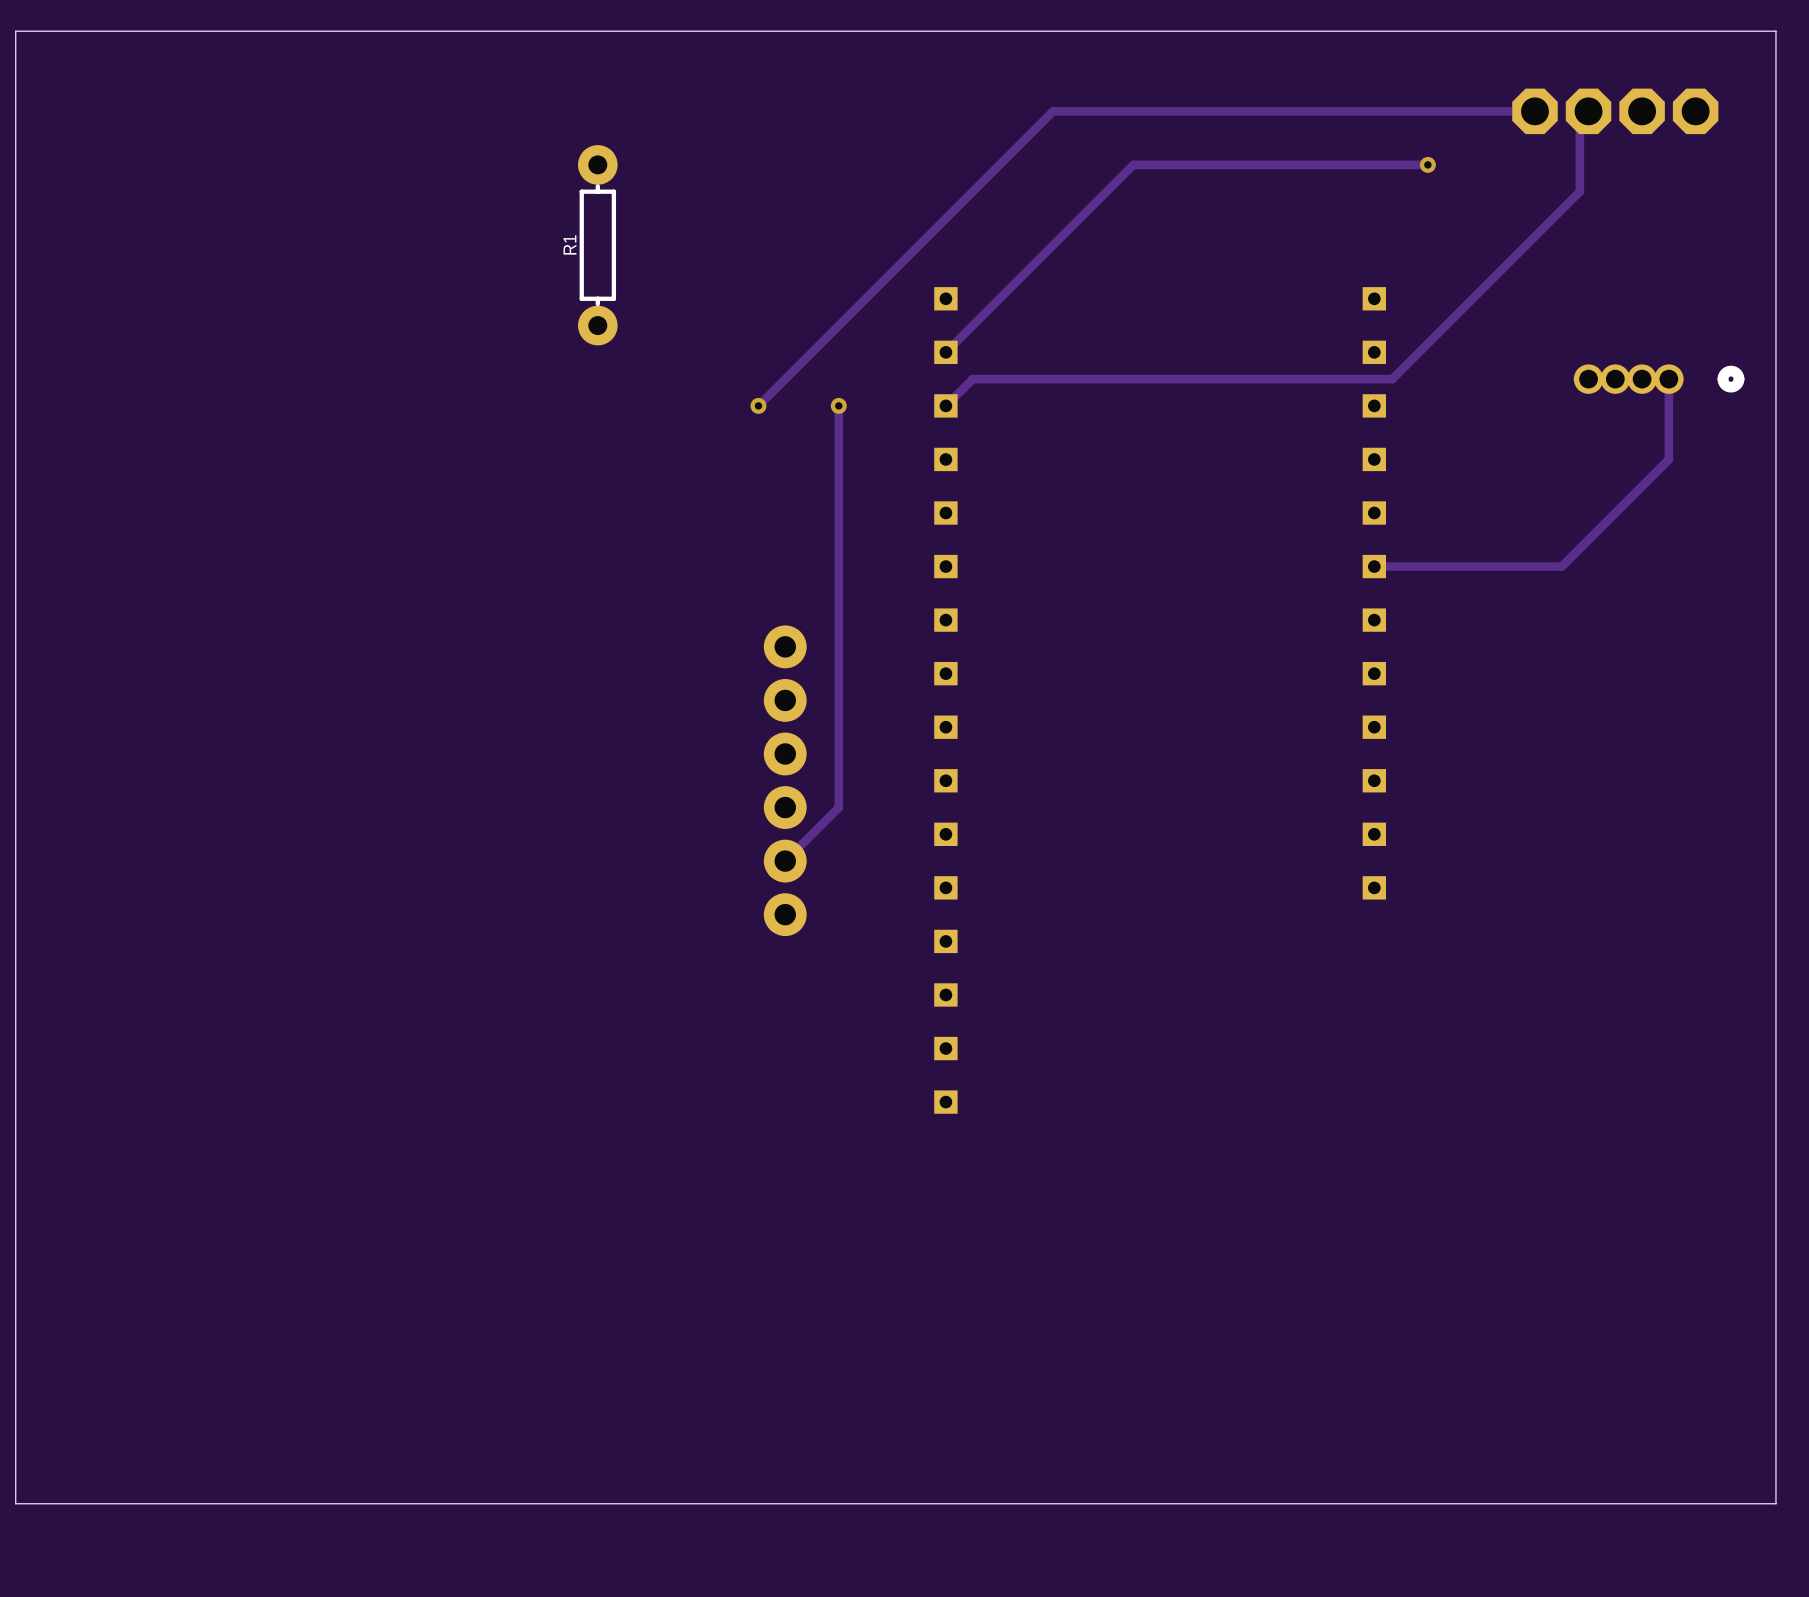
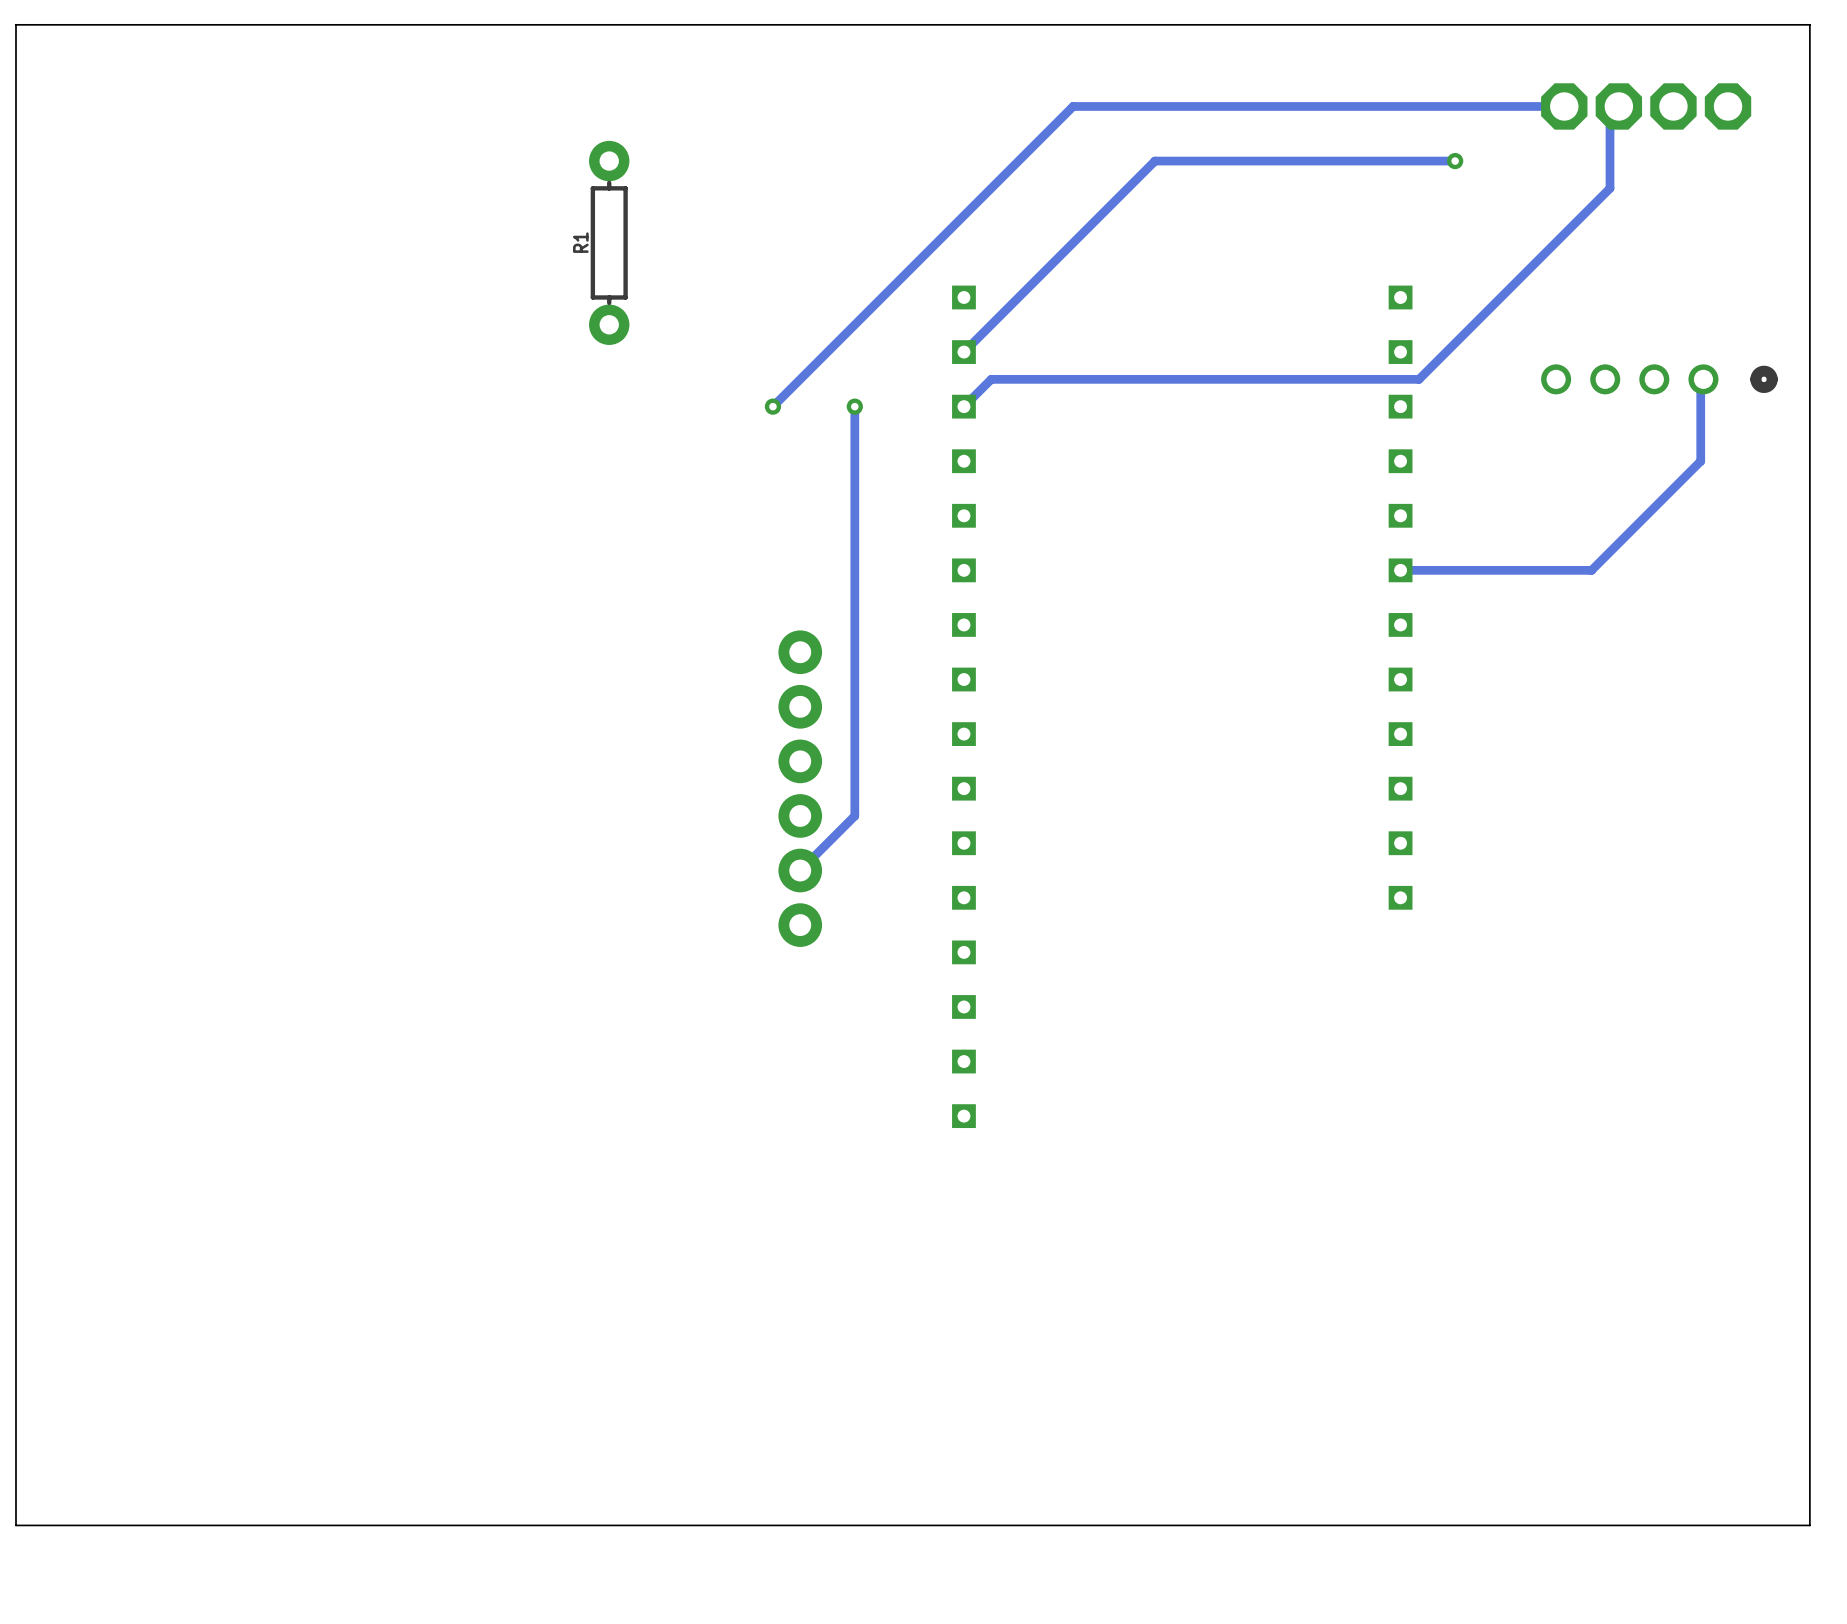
part: none -> (1659, 379)
part: (1659, 379) -> none

